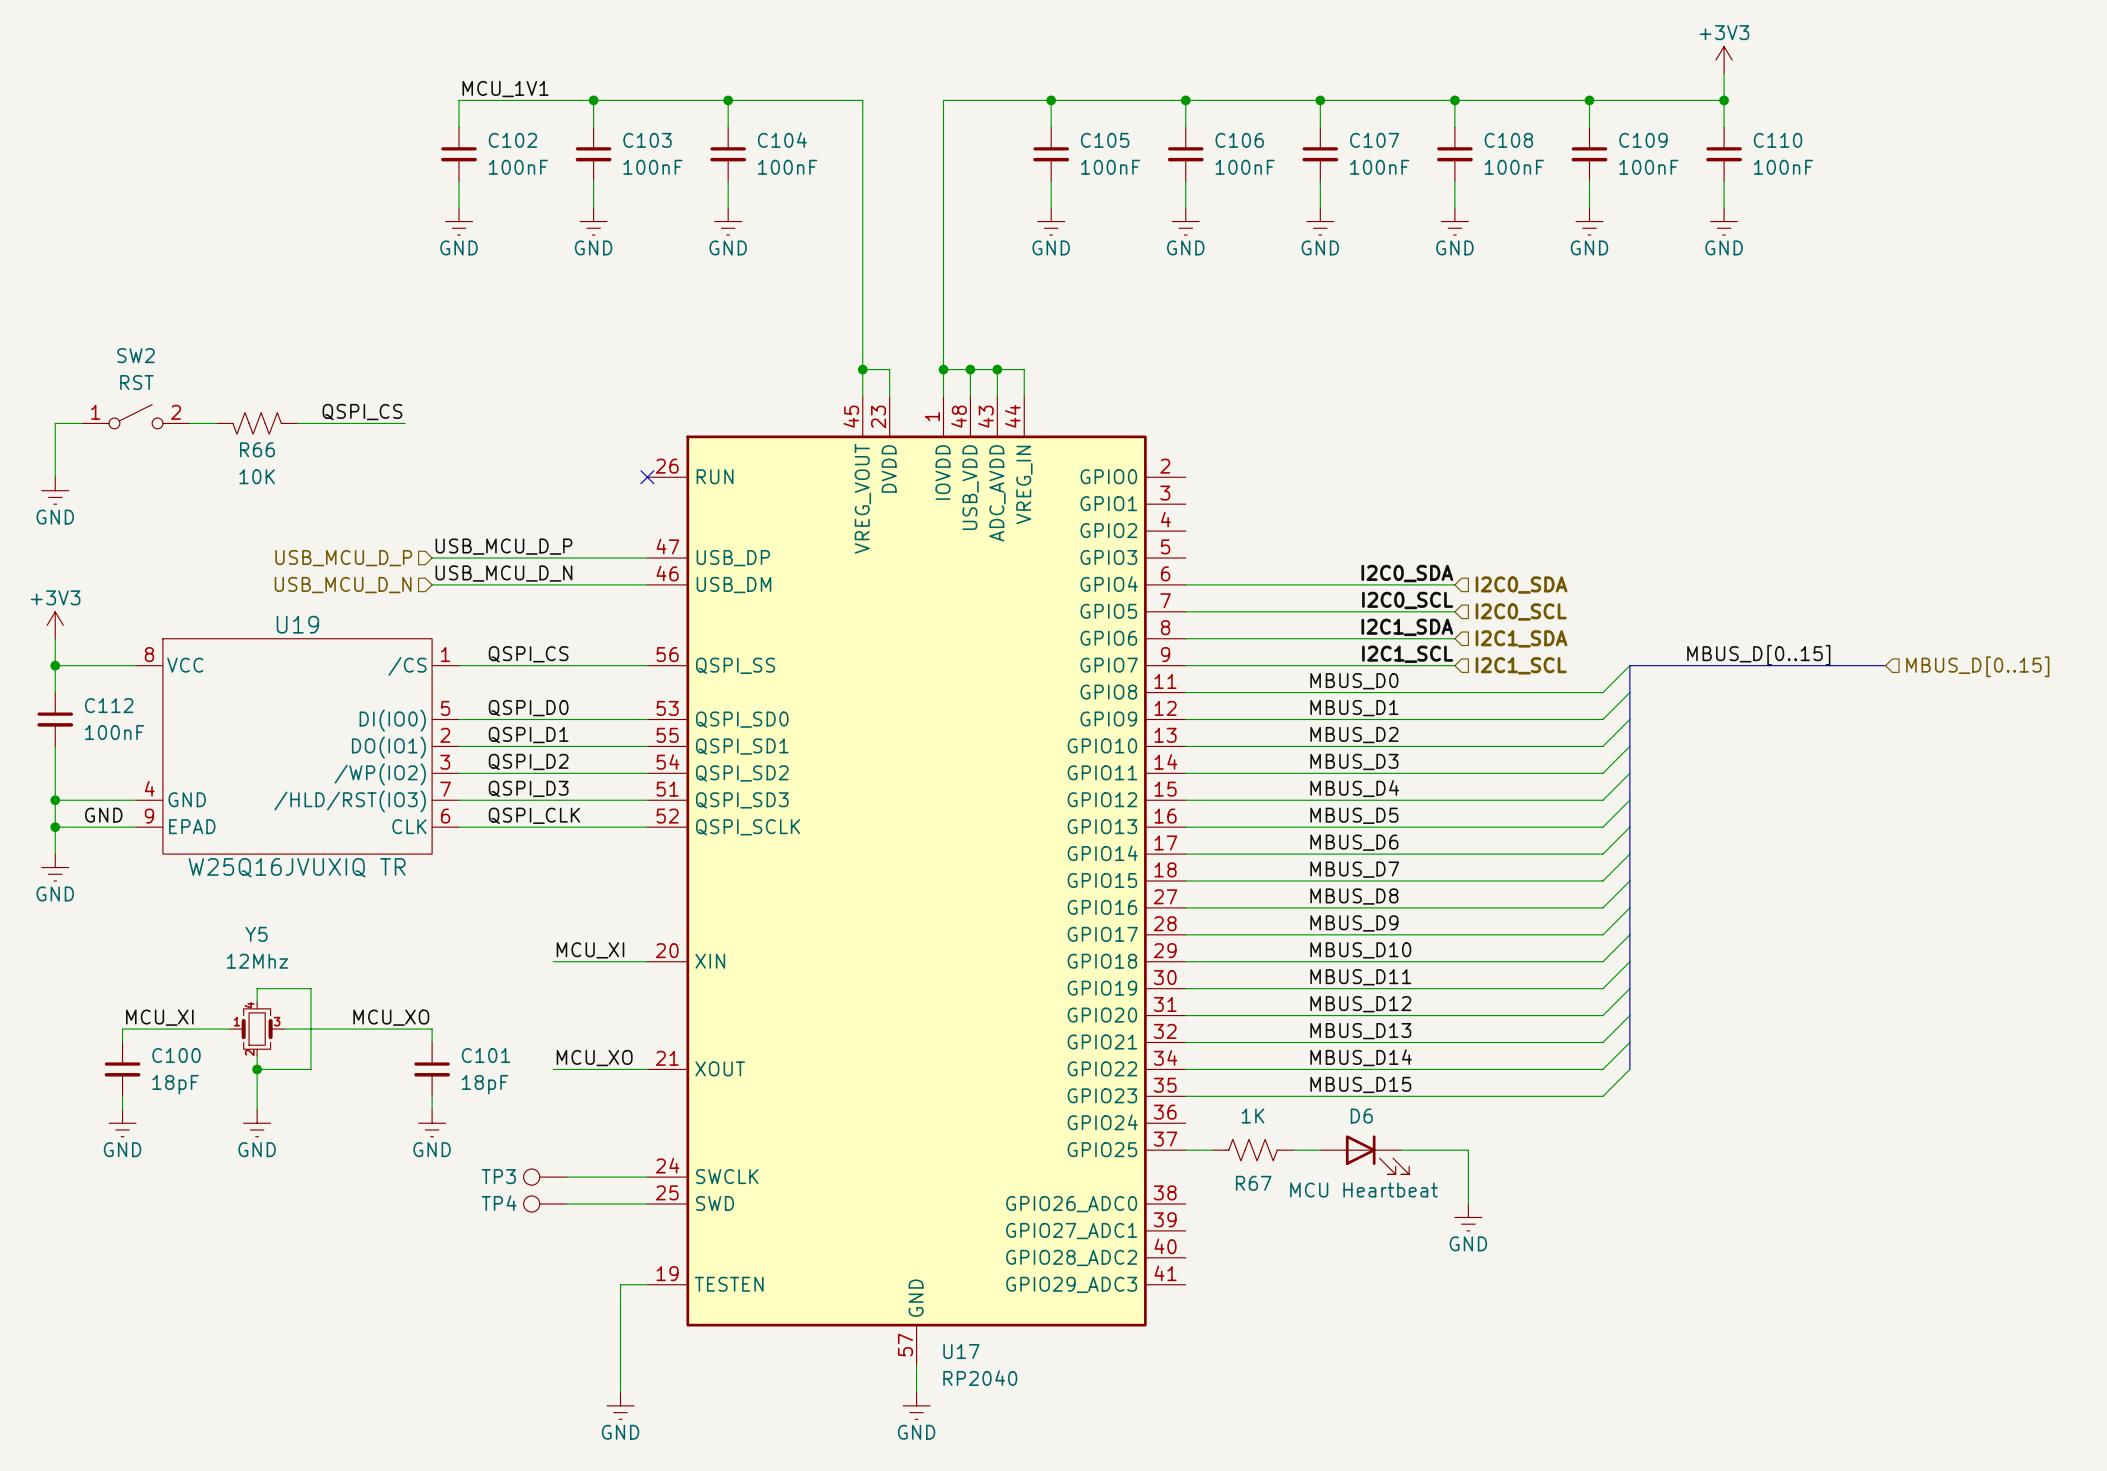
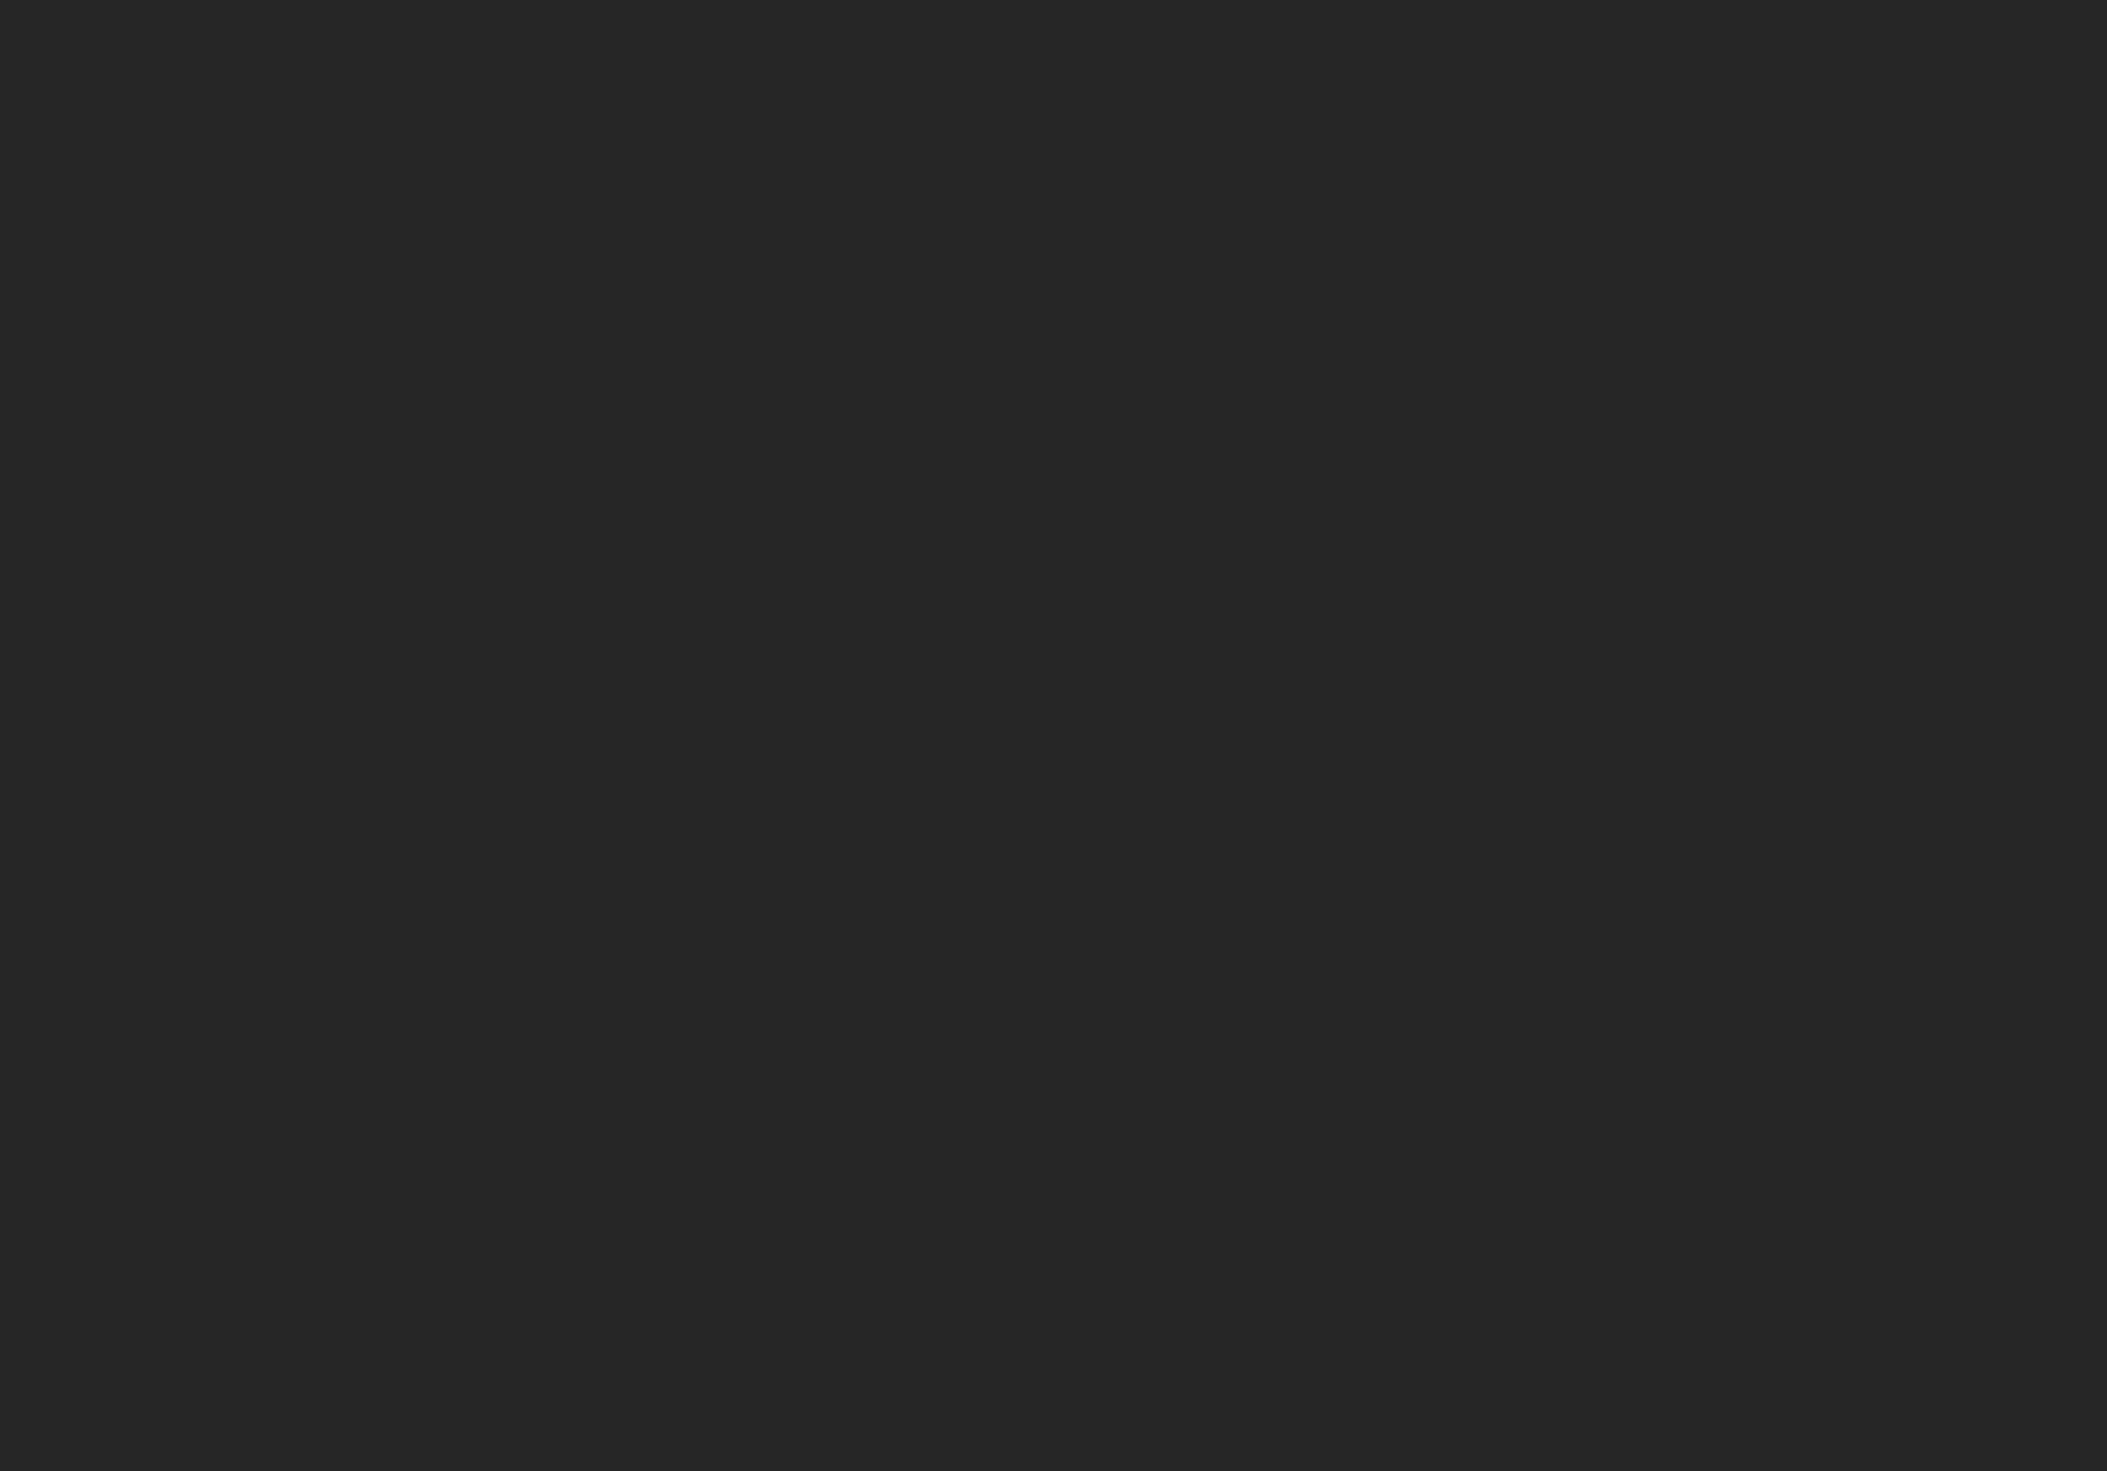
power symbol: +3V3 (1724, 60) -> none
wire: (1724, 73) (1724, 127) -> none
label: MCU_1V1 (505, 89) -> none
wire: (593, 100) (593, 127) -> none
junction: (593, 100) -> none
wire: (728, 100) (728, 127) -> none
junction: (728, 100) -> none
wire: (1051, 100) (1051, 127) -> none
junction: (1051, 100) -> none
wire: (1185, 100) (1185, 127) -> none
junction: (1185, 100) -> none
wire: (1320, 100) (1320, 127) -> none
junction: (1320, 100) -> none
wire: (1454, 100) (1454, 127) -> none
junction: (1454, 100) -> none
wire: (1589, 100) (1589, 127) -> none
junction: (1589, 100) -> none
wire: (1724, 100) (943, 100) (943, 396) -> none
junction: (1724, 100) -> none
wire: (459, 127) (459, 100) (862, 100) (862, 396) -> none
C102: 100nF (459, 154) -> none
C103: 100nF (593, 154) -> none
C104: 100nF (728, 154) -> none
C105: 100nF (1051, 154) -> none
C106: 100nF (1185, 154) -> none
C107: 100nF (1320, 154) -> none
C108: 100nF (1454, 154) -> none
C109: 100nF (1589, 154) -> none
C110: 100nF (1724, 154) -> none
wire: (459, 181) (459, 208) -> none
wire: (593, 181) (593, 208) -> none
wire: (728, 181) (728, 208) -> none
wire: (1051, 181) (1051, 208) -> none
wire: (1185, 181) (1185, 208) -> none
wire: (1320, 181) (1320, 208) -> none
wire: (1454, 181) (1454, 208) -> none
wire: (1589, 181) (1589, 208) -> none
wire: (1724, 181) (1724, 208) -> none
power symbol: GND (459, 221) -> none
power symbol: GND (593, 221) -> none
power symbol: GND (728, 221) -> none
power symbol: GND (1051, 221) -> none
power symbol: GND (1185, 221) -> none
power symbol: GND (1320, 221) -> none
power symbol: GND (1454, 221) -> none
power symbol: GND (1589, 221) -> none
power symbol: GND (1724, 221) -> none
wire: (862, 369) (889, 369) (889, 396) -> none
junction: (862, 369) -> none
wire: (943, 369) (1024, 369) (1024, 396) -> none
junction: (943, 369) -> none
wire: (970, 369) (970, 396) -> none
junction: (970, 369) -> none
wire: (997, 369) (997, 396) -> none
junction: (997, 369) -> none
label: QSPI_CS (362, 412) -> none
SW2: RST (136, 416) -> none
wire: (82, 423) (55, 423) (55, 477) -> none
wire: (189, 423) (216, 423) -> none
R66: 10K (257, 423) -> none
wire: (297, 423) (405, 423) -> none
no-connect mark: (647, 477) -> none
power symbol: GND (55, 490) -> none
label: USB_MCU_D_P (503, 546) -> none
hierarchical label: USB_MCU_D_P (343, 558) -> none
wire: (432, 558) (647, 558) -> none
label: USB_MCU_D_N (503, 573) -> none
label: I2C0_SDA (1407, 573) -> none
wire: (432, 584) (647, 584) -> none
wire: (1185, 584) (1454, 584) -> none
hierarchical label: USB_MCU_D_N (343, 585) -> none
hierarchical label: I2C0_SDA (1521, 585) -> none
label: I2C0_SCL (1407, 600) -> none
wire: (1185, 611) (1454, 611) -> none
hierarchical label: I2C0_SCL (1521, 611) -> none
power symbol: +3V3 (55, 625) -> none
label: I2C1_SDA (1407, 627) -> none
wire: (55, 638) (55, 692) -> none
wire: (1185, 638) (1454, 638) -> none
hierarchical label: I2C1_SDA (1521, 638) -> none
label: QSPI_CS (528, 654) -> none
label: I2C1_SCL (1407, 654) -> none
label: MBUS_D[0..15] (1758, 655) -> none
wire: (55, 665) (136, 665) -> none
junction: (55, 665) -> none
wire: (459, 665) (647, 665) -> none
wire: (1185, 665) (1454, 665) -> none
hierarchical label: I2C1_SCL (1521, 665) -> none
wire: (1629, 665) (1602, 692) (1185, 692) -> none
bus: (1885, 665) (1629, 665) (1629, 1069) -> none
hierarchical label: MBUS_D[0..15] (1977, 666) -> none
label: MBUS_D0 (1354, 681) -> none
wire: (1629, 692) (1602, 719) (1185, 719) -> none
label: QSPI_D0 (528, 708) -> none
label: MBUS_D1 (1354, 708) -> none
C112: 100nF (55, 719) -> none
wire: (459, 719) (647, 719) -> none
wire: (1629, 719) (1602, 746) (1185, 746) -> none
label: QSPI_D1 (528, 735) -> none
label: MBUS_D2 (1354, 735) -> none
wire: (55, 746) (55, 854) -> none
U19: W25Q16JVUXIQ TR (297, 746) -> none
wire: (459, 746) (647, 746) -> none
wire: (1629, 746) (1602, 773) (1185, 773) -> none
label: QSPI_D2 (528, 761) -> none
label: MBUS_D3 (1354, 761) -> none
wire: (459, 773) (647, 773) -> none
wire: (1629, 773) (1602, 800) (1185, 800) -> none
label: QSPI_D3 (528, 788) -> none
label: MBUS_D4 (1354, 788) -> none
wire: (55, 800) (136, 800) -> none
junction: (55, 800) -> none
wire: (459, 800) (647, 800) -> none
wire: (1629, 800) (1602, 827) (1185, 827) -> none
label: GND (103, 815) -> none
label: QSPI_CLK (534, 815) -> none
label: MBUS_D5 (1354, 815) -> none
wire: (55, 827) (136, 827) -> none
junction: (55, 827) -> none
wire: (459, 827) (647, 827) -> none
wire: (1629, 827) (1602, 854) (1185, 854) -> none
label: MBUS_D6 (1354, 842) -> none
wire: (1629, 854) (1602, 881) (1185, 881) -> none
power symbol: GND (55, 867) -> none
label: MBUS_D7 (1354, 869) -> none
U17: RP2040 (916, 881) -> none
wire: (1629, 881) (1602, 907) (1185, 907) -> none
label: MBUS_D8 (1354, 896) -> none
wire: (1629, 907) (1602, 934) (1185, 934) -> none
label: MBUS_D9 (1354, 923) -> none
wire: (1629, 934) (1602, 961) (1185, 961) -> none
label: MCU_XI (590, 950) -> none
label: MBUS_D10 (1360, 950) -> none
wire: (553, 961) (647, 961) -> none
wire: (1629, 961) (1602, 988) (1185, 988) -> none
label: MBUS_D11 (1360, 977) -> none
wire: (1629, 988) (1602, 1015) (1185, 1015) -> none
wire: (257, 1002) (257, 988) (310, 988) (310, 1069) (257, 1069) -> none
label: MBUS_D12 (1360, 1004) -> none
wire: (1629, 1015) (1602, 1042) (1185, 1042) -> none
label: MCU_XI (159, 1017) -> none
label: MCU_XO (391, 1017) -> none
wire: (230, 1029) (122, 1029) (122, 1042) -> none
Y5: 12Mhz (257, 1029) -> none
wire: (284, 1029) (432, 1029) (432, 1042) -> none
label: MBUS_D13 (1360, 1031) -> none
wire: (1629, 1042) (1602, 1069) (1185, 1069) -> none
wire: (257, 1055) (257, 1109) -> none
label: MBUS_D14 (1361, 1057) -> none
label: MCU_XO (594, 1058) -> none
C100: 18pF (122, 1069) -> none
junction: (257, 1069) -> none
C101: 18pF (432, 1069) -> none
wire: (553, 1069) (647, 1069) -> none
wire: (1629, 1069) (1602, 1096) (1185, 1096) -> none
label: MBUS_D15 (1360, 1084) -> none
wire: (122, 1096) (122, 1109) -> none
wire: (432, 1096) (432, 1109) -> none
power symbol: GND (122, 1123) -> none
power symbol: GND (257, 1123) -> none
power symbol: GND (432, 1123) -> none
wire: (1185, 1150) (1212, 1150) -> none
R67: 1K (1253, 1150) -> none
wire: (1293, 1150) (1320, 1150) -> none
wire: (1401, 1150) (1468, 1150) (1468, 1204) -> none
D6: MCU Heartbeat (1364, 1154) -> none
TP3: (545, 1177) -> none
wire: (566, 1177) (647, 1177) -> none
TP4: (545, 1204) -> none
wire: (566, 1204) (647, 1204) -> none
power symbol: GND (1468, 1217) -> none
wire: (647, 1284) (620, 1284) (620, 1392) -> none
wire: (916, 1365) (916, 1392) -> none
power symbol: GND (620, 1405) -> none
power symbol: GND (916, 1405) -> none

